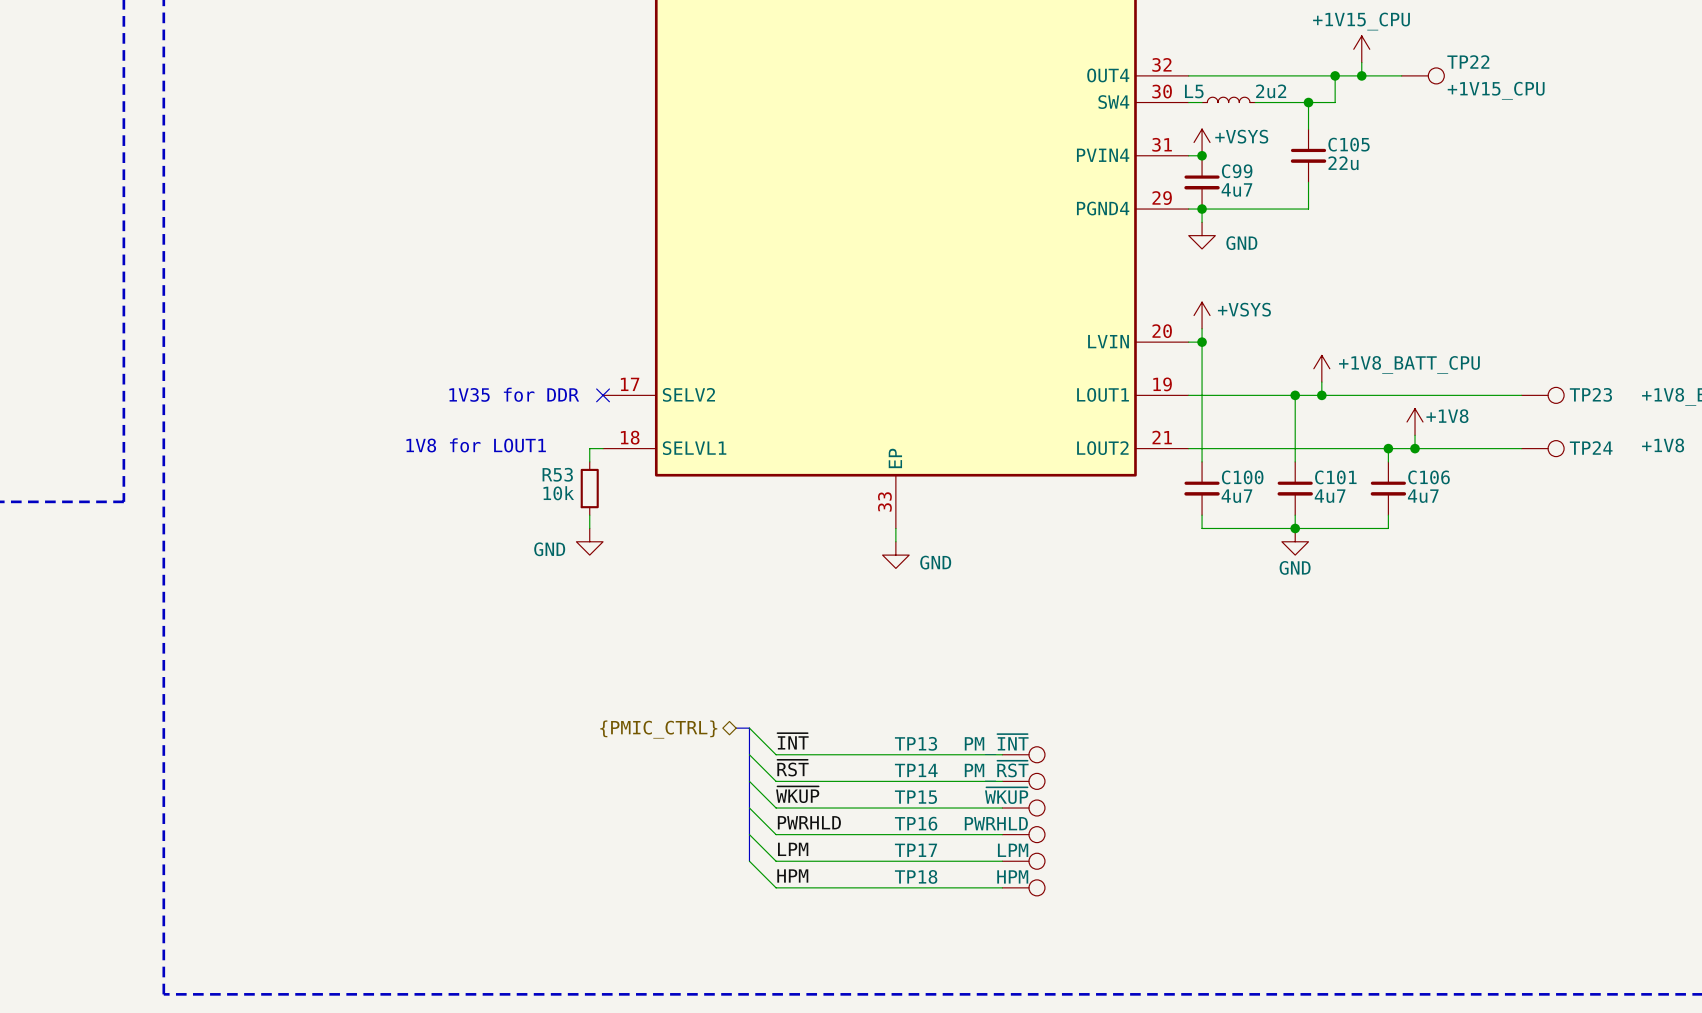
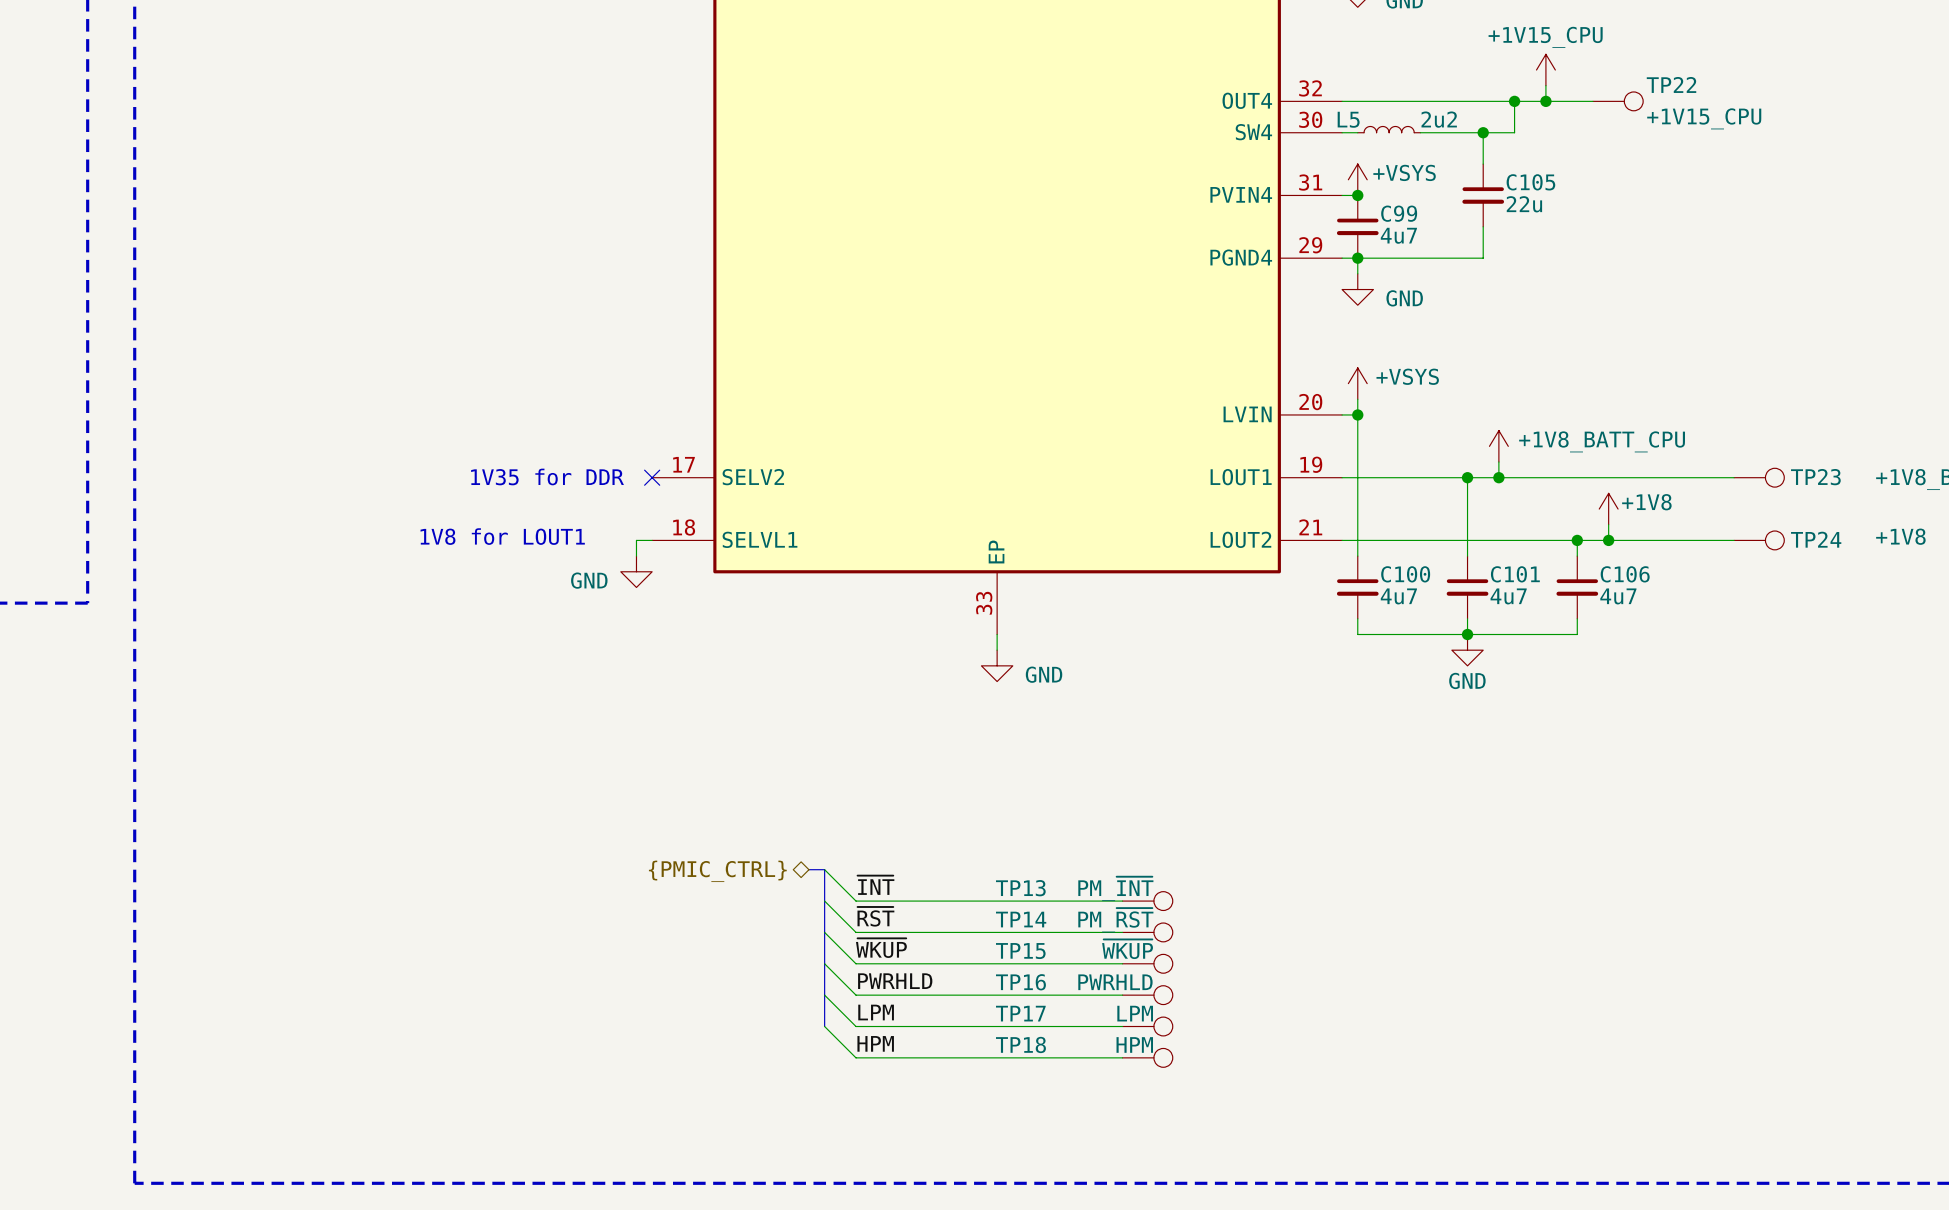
R53: 10k (589, 488) -> none
wire: (589, 515) (589, 528) -> none
power symbol position: GND (589, 541) -> GND (636, 571)

